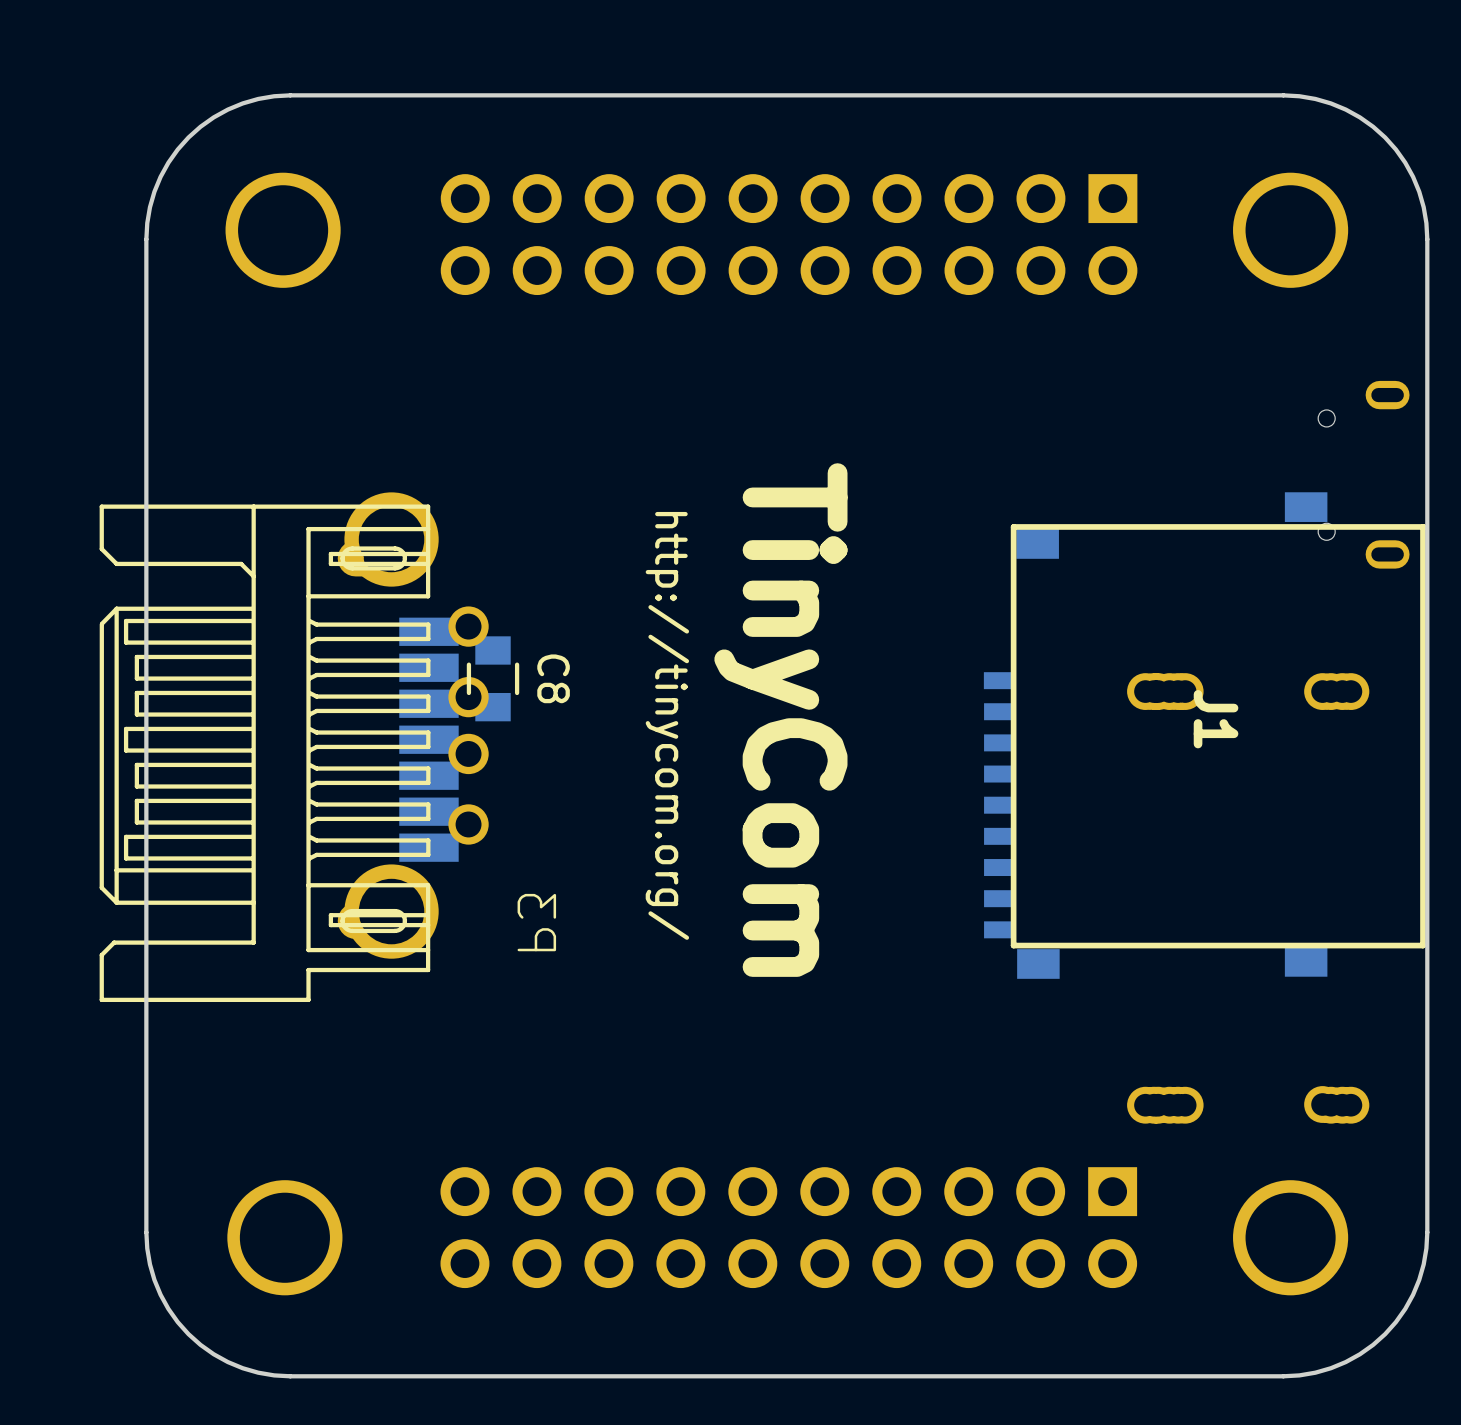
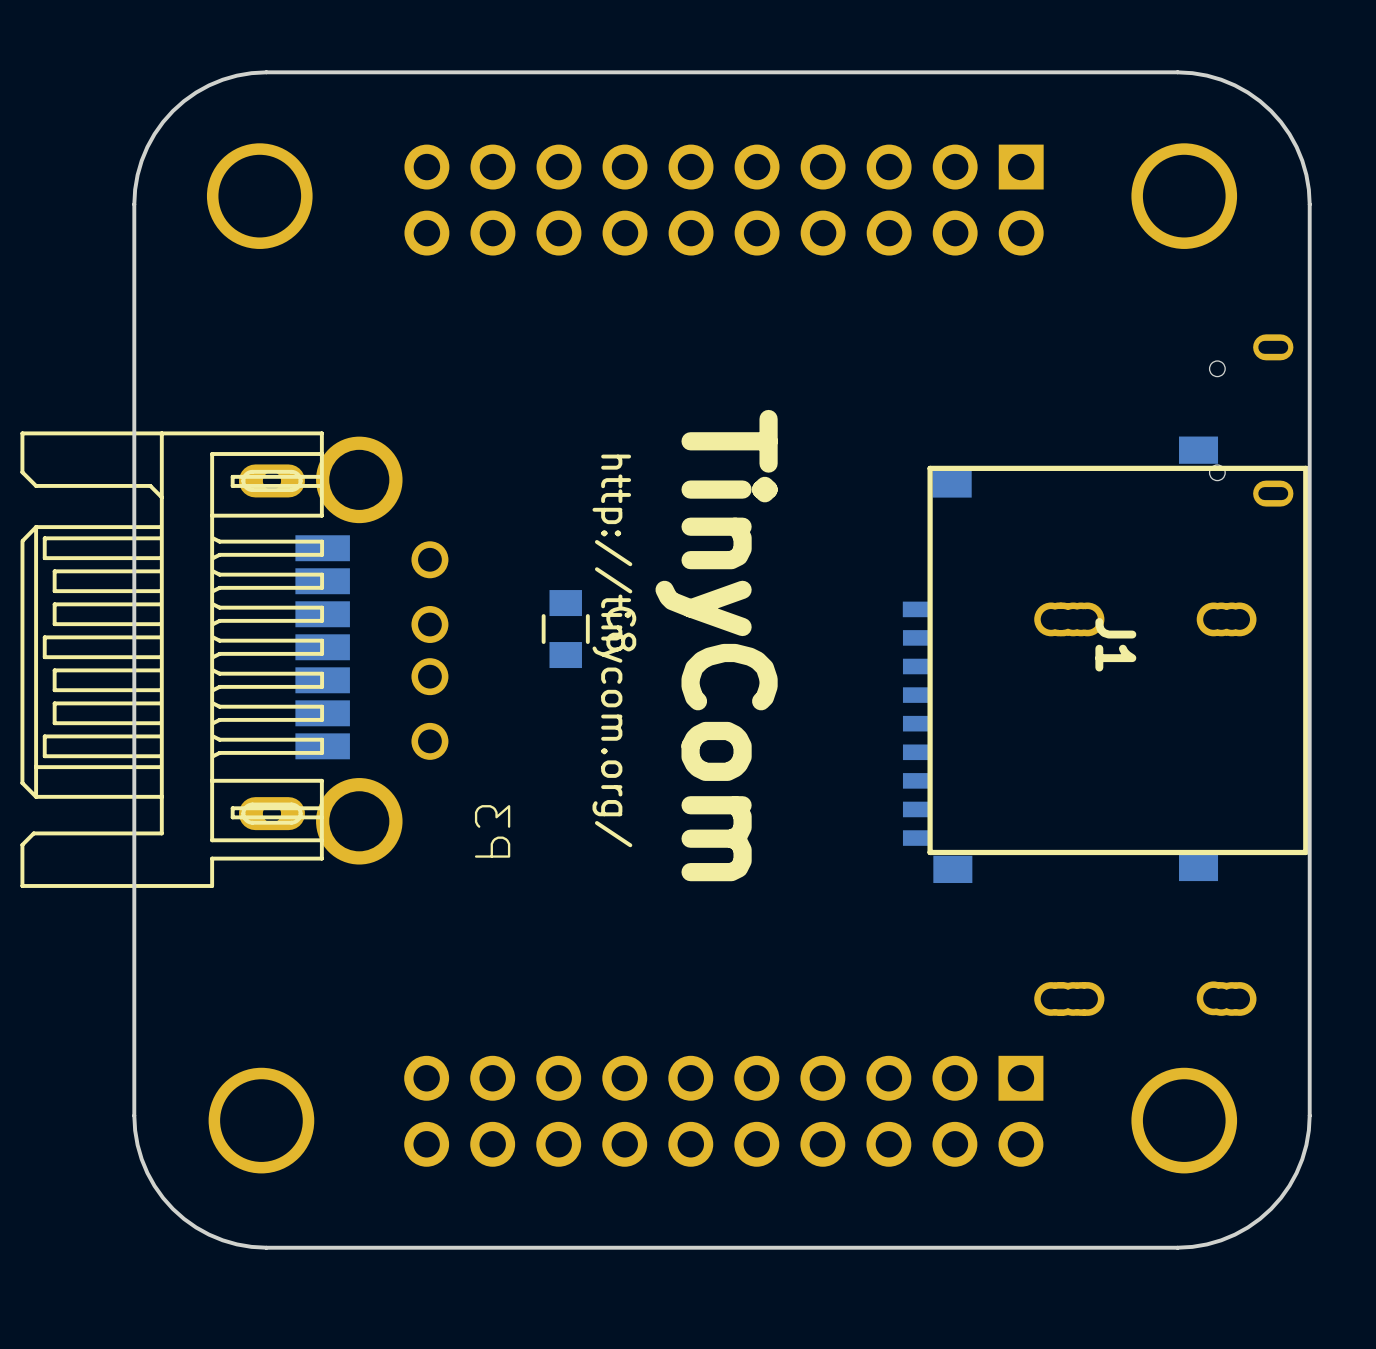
C8 position: (493, 678) -> (565, 629)
part position: (279, 753) -> (185, 659)

